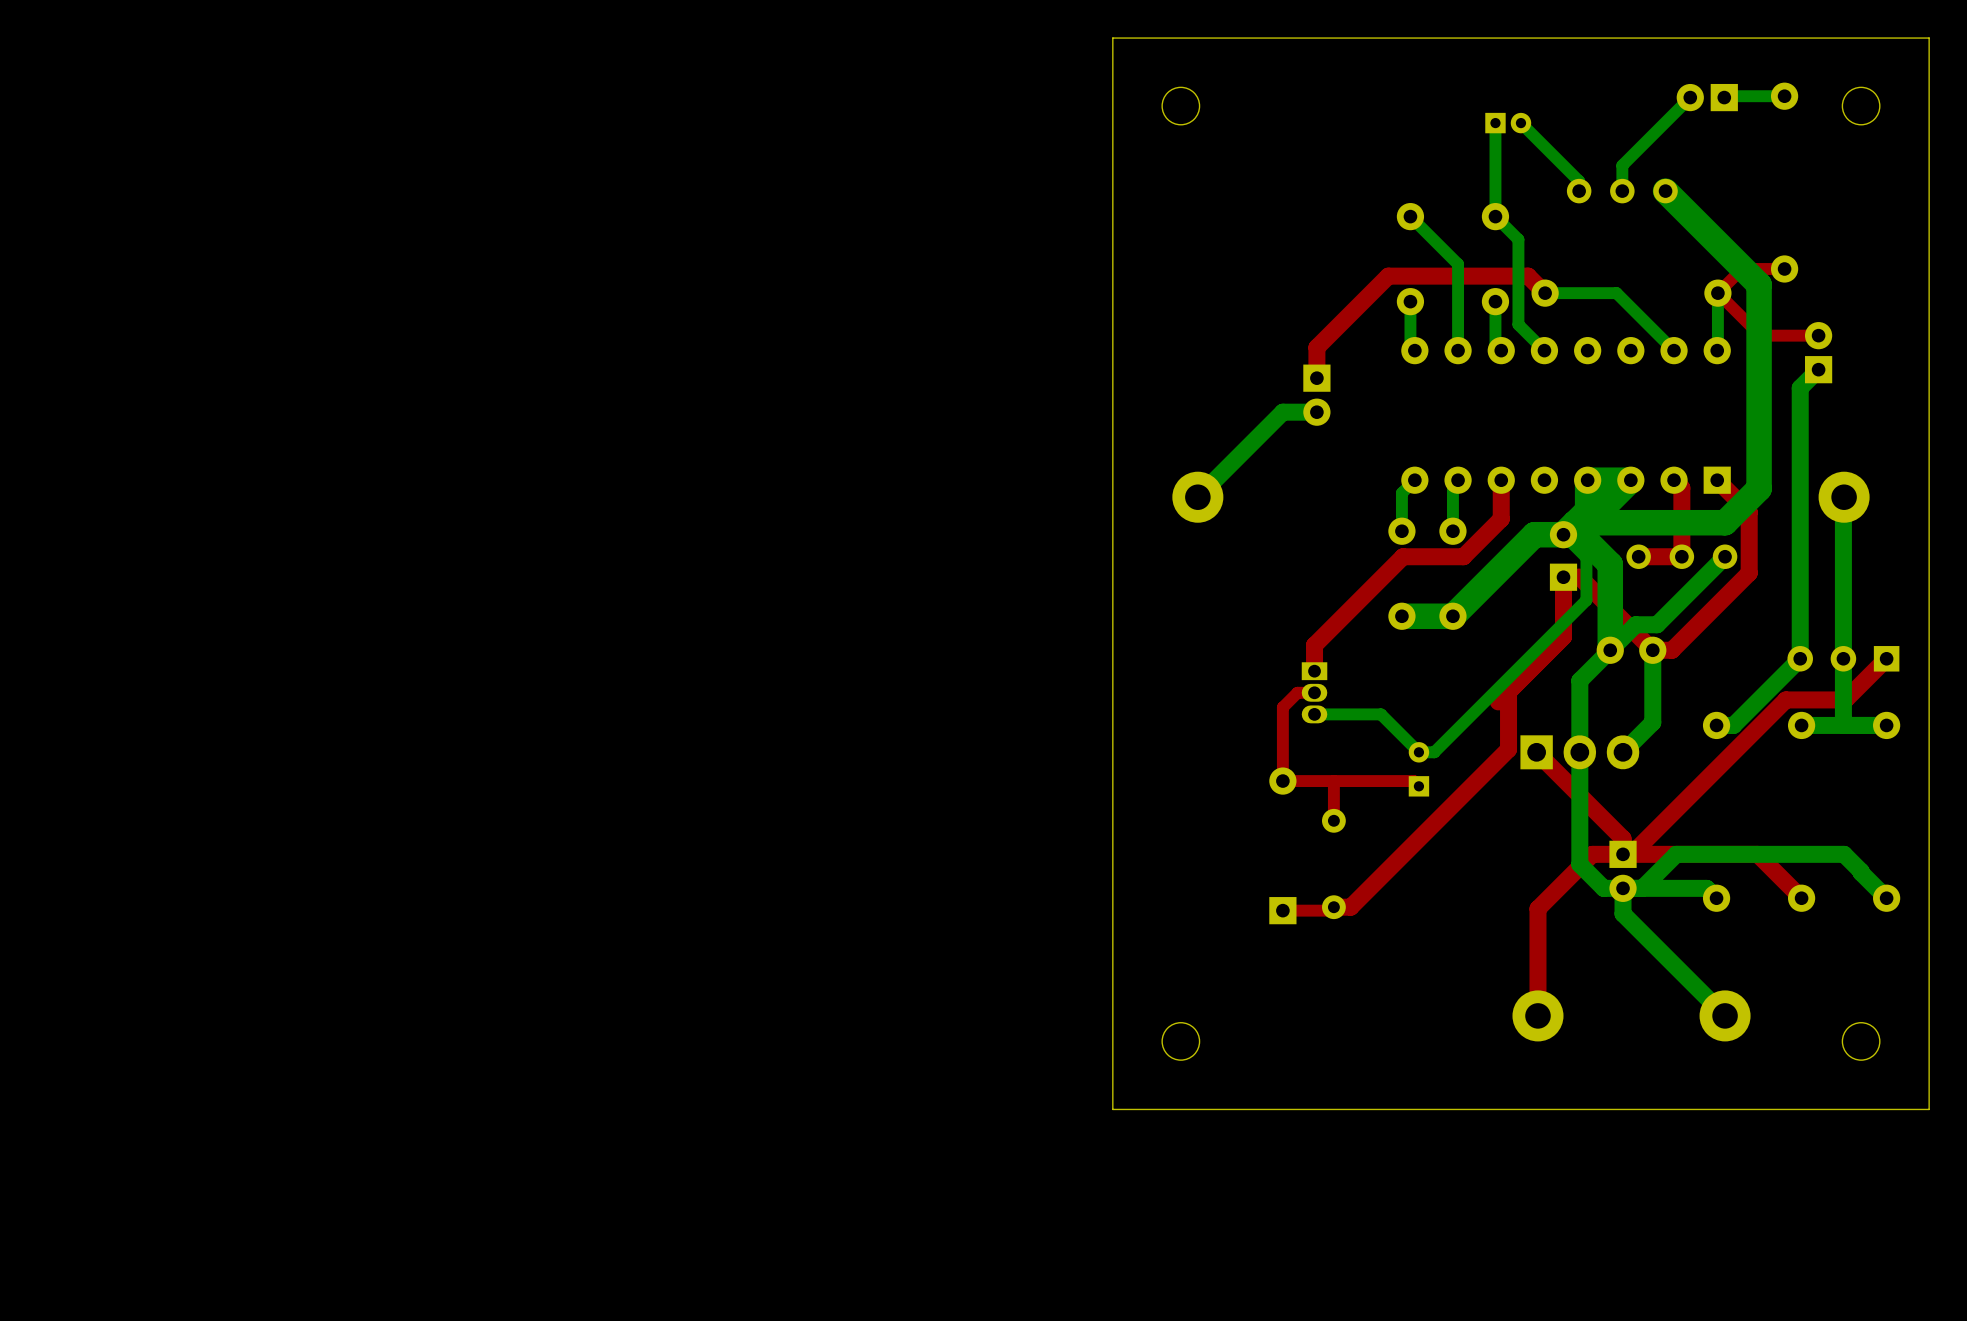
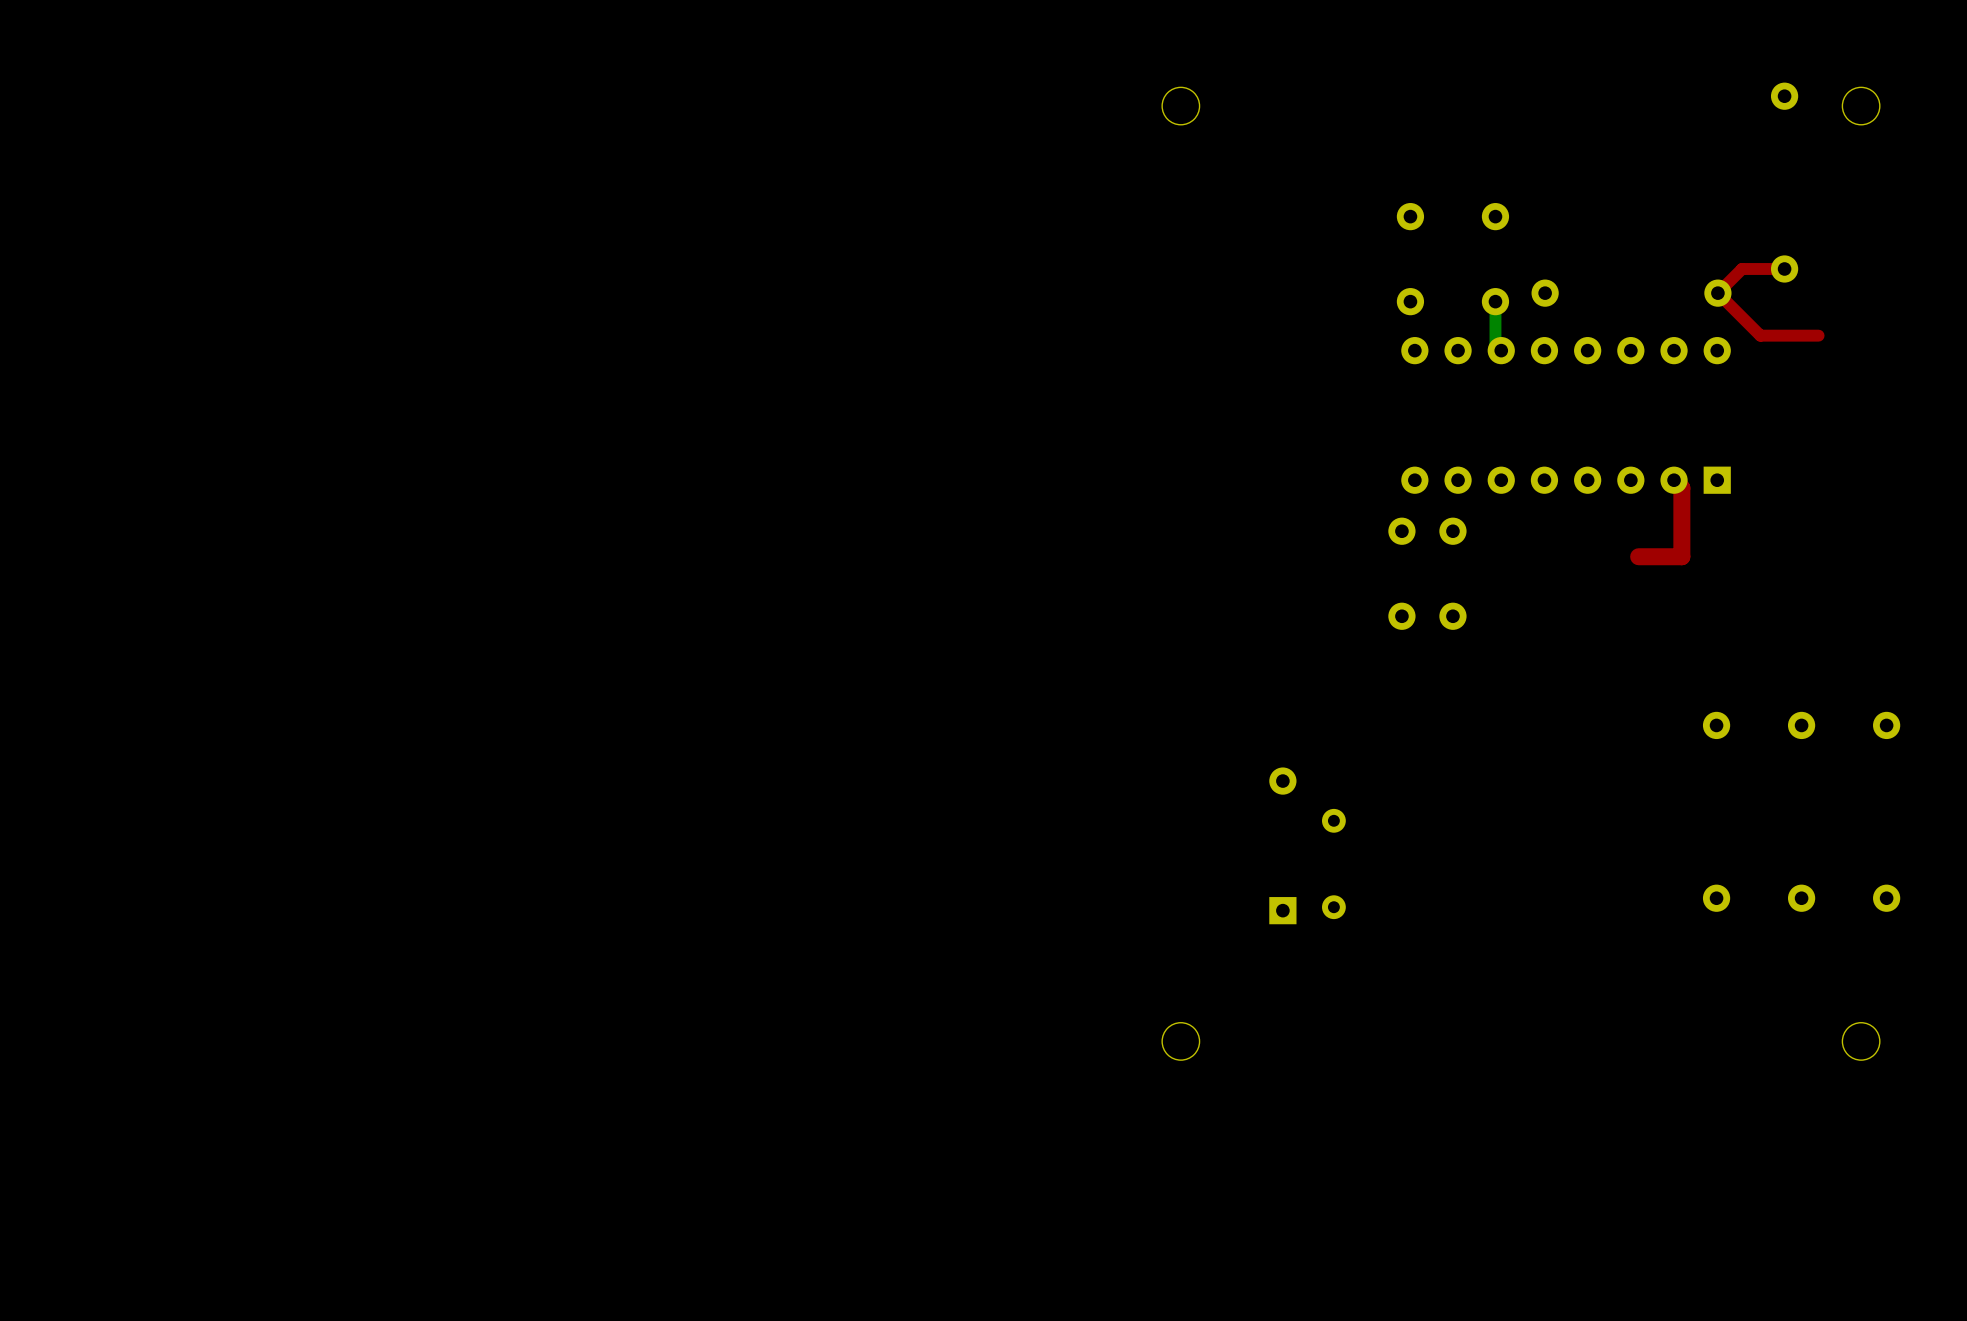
board edge: (1929, 38) (1112, 38) (1112, 1109) (1929, 1109) (1929, 38) -> none
bottom track: (1784, 96) (1725, 96) -> none
bottom track: (1690, 97) (1622, 165) (1622, 191) -> none
part: (1707, 97) -> none
bottom track: (1495, 123) (1495, 216) (1518, 239) (1518, 324) (1544, 350) -> none
part: (1508, 123) -> none
bottom track: (1520, 123) (1579, 181) (1579, 191) -> none
part: (1622, 191) -> none
bottom track: (1665, 191) (1759, 284) (1759, 488) (1725, 522) (1575, 522) -> none
bottom track: (1410, 216) (1458, 264) (1458, 350) -> none
top track: (1530, 278) (1545, 293) (1528, 276) (1388, 276) (1316, 347) (1316, 378) -> none
bottom track: (1545, 293) (1616, 293) (1674, 350) -> none
bottom track: (1717, 293) (1717, 349) -> none
bottom track: (1410, 301) (1410, 346) -> none
part: (1818, 352) -> none
bottom track: (1818, 369) (1800, 388) (1800, 658) (1733, 725) (1716, 725) -> none
part: (1316, 395) -> none
bottom track: (1316, 412) (1282, 412) (1197, 497) -> none
bottom track: (1414, 480) (1401, 493) (1401, 531) -> none
top track: (1501, 480) (1501, 519) (1463, 556) (1403, 556) (1314, 645) (1314, 671) -> none
top track: (1717, 480) (1749, 512) (1749, 573) (1672, 650) (1652, 650) (1579, 577) (1563, 577) (1563, 636) (1498, 701) -> none
bottom track: (1452, 485) (1452, 531) -> none
part: (1197, 497) -> none
bottom track: (1843, 497) (1843, 724) (1844, 725) (1801, 725) (1886, 725) -> none
part: (1844, 497) -> none
bottom track: (1576, 534) (1630, 480) (1587, 480) (1587, 510) (1563, 534) (1586, 557) (1586, 600) (1434, 752) (1418, 752) (1381, 714) (1314, 714) -> none
part: (1563, 555) -> none
part: (1681, 556) -> none
bottom track: (1725, 556) (1657, 624) (1635, 624) (1579, 680) (1579, 864) (1603, 888) (1706, 888) (1716, 898) -> none
bottom track: (1401, 616) (1452, 616) (1534, 534) (1580, 534) (1610, 564) (1610, 650) -> none
part: (1631, 650) -> none
bottom track: (1652, 650) (1652, 722) (1623, 752) -> none
part: (1843, 658) -> none
top track: (1886, 658) (1845, 699) (1785, 699) (1631, 854) -> none
top track: (1508, 691) (1508, 749) (1350, 907) (1333, 907) -> none
top track: (1314, 692) (1297, 692) (1282, 707) (1282, 781) (1413, 781) (1418, 786) -> none
part: (1314, 692) -> none
top track: (1536, 752) (1623, 838) (1623, 854) -> none
part: (1579, 752) -> none
part: (1418, 769) -> none
top track: (1333, 781) (1333, 820) -> none
part: (1623, 871) -> none
bottom track: (1623, 888) (1623, 913) (1725, 1015) -> none
bottom track: (1642, 888) (1676, 854) (1844, 854) (1886, 898) -> none
top track: (1801, 898) (1757, 854) (1592, 854) (1537, 908) (1537, 1015) -> none
top track: (1330, 910) (1282, 910) -> none
part: (1537, 1015) -> none
part: (1725, 1015) -> none

